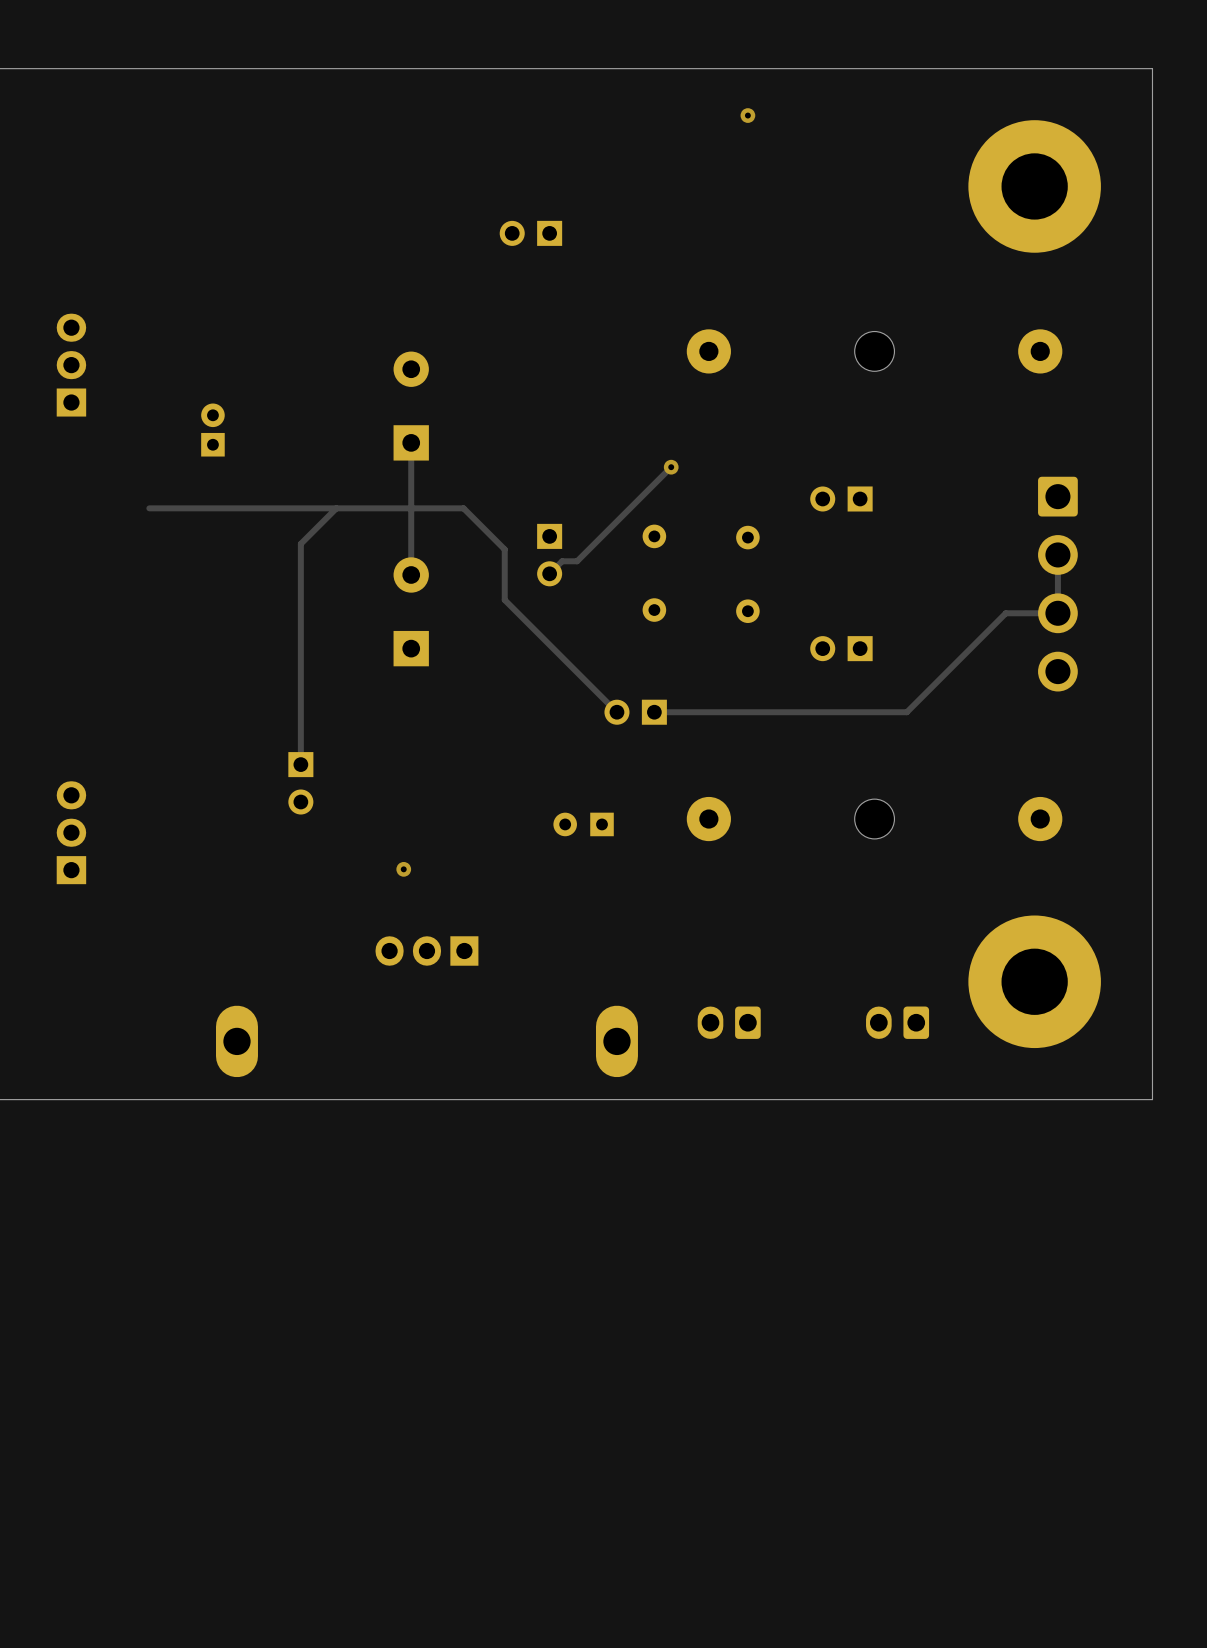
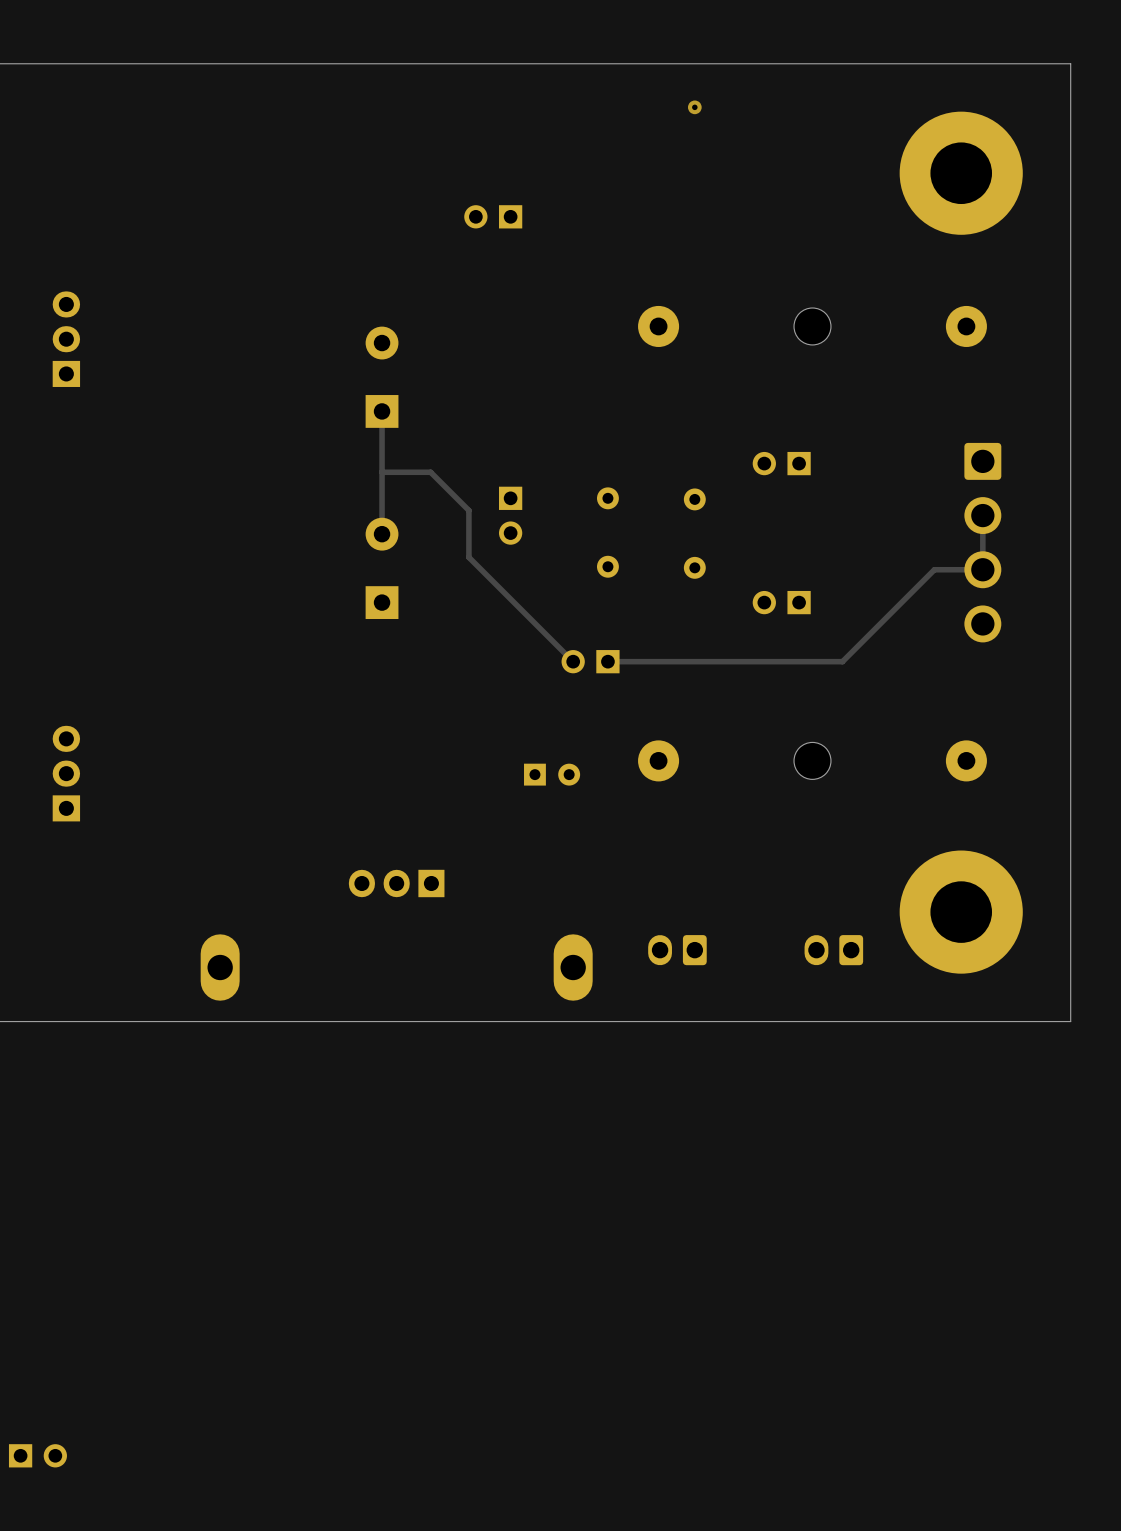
part: (212, 430) -> none
track: (671, 467) (577, 561) (562, 561) (549, 573) -> none
via: (671, 467) -> none
track: (336, 508) (300, 543) (300, 764) -> none
track: (411, 508) (149, 508) -> none
part: (300, 783) -> none
part rotation: 0° (583, 824) -> 180° (552, 774)
via: (403, 869) -> none
part: none -> (37, 1455)

